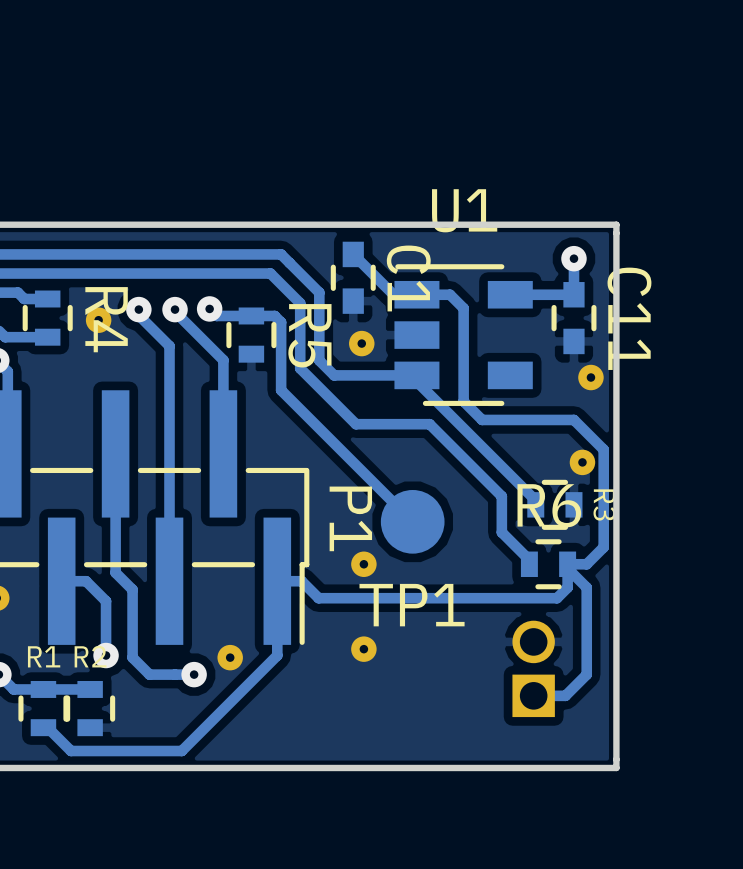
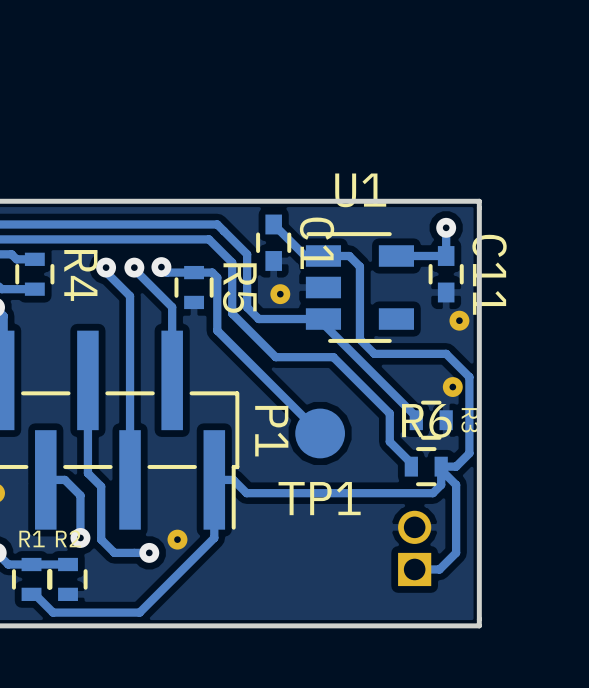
part: (98, 320) -> none
part: (363, 564) -> none
part: (363, 649) -> none

